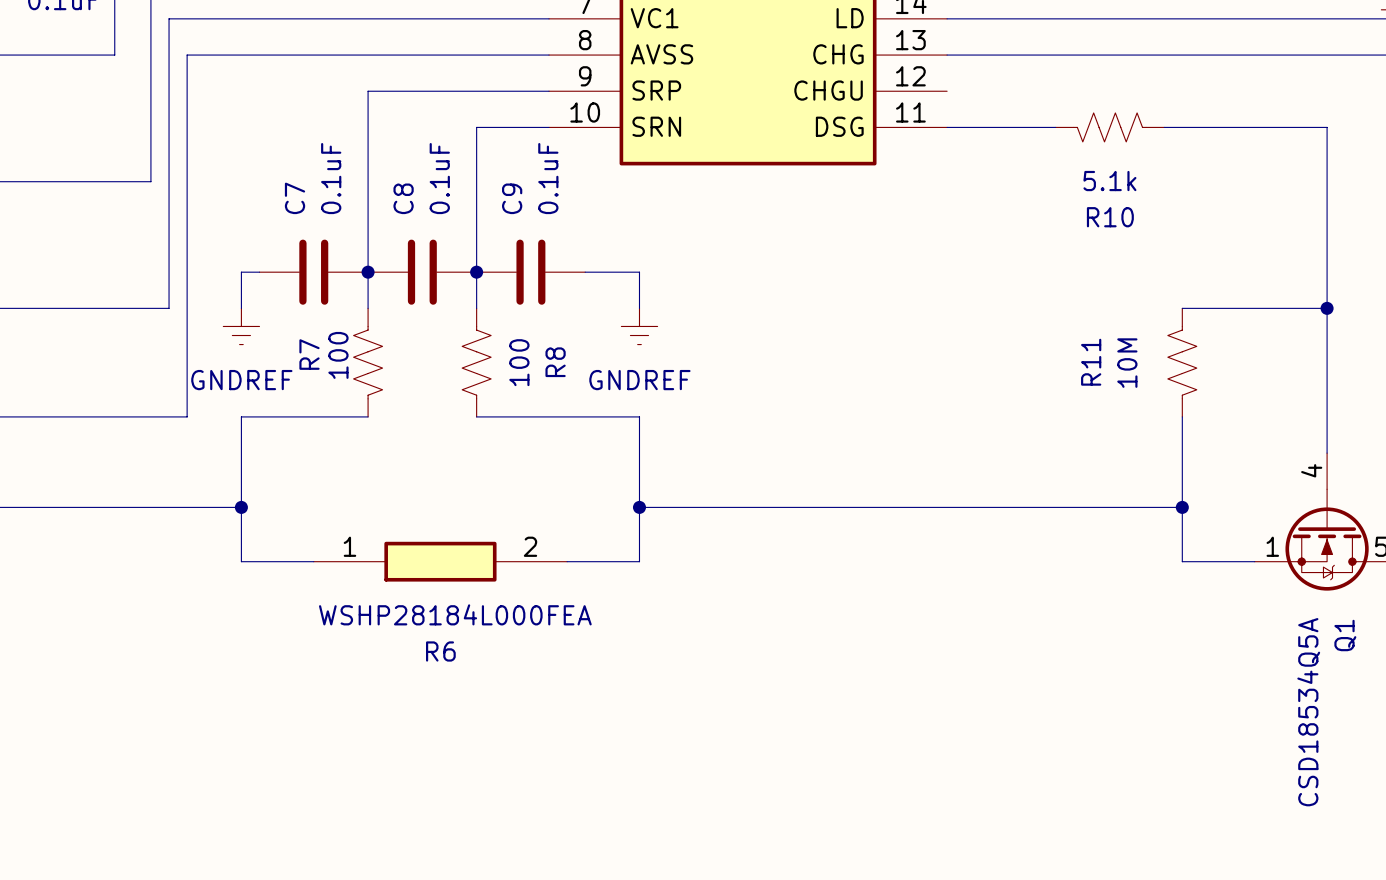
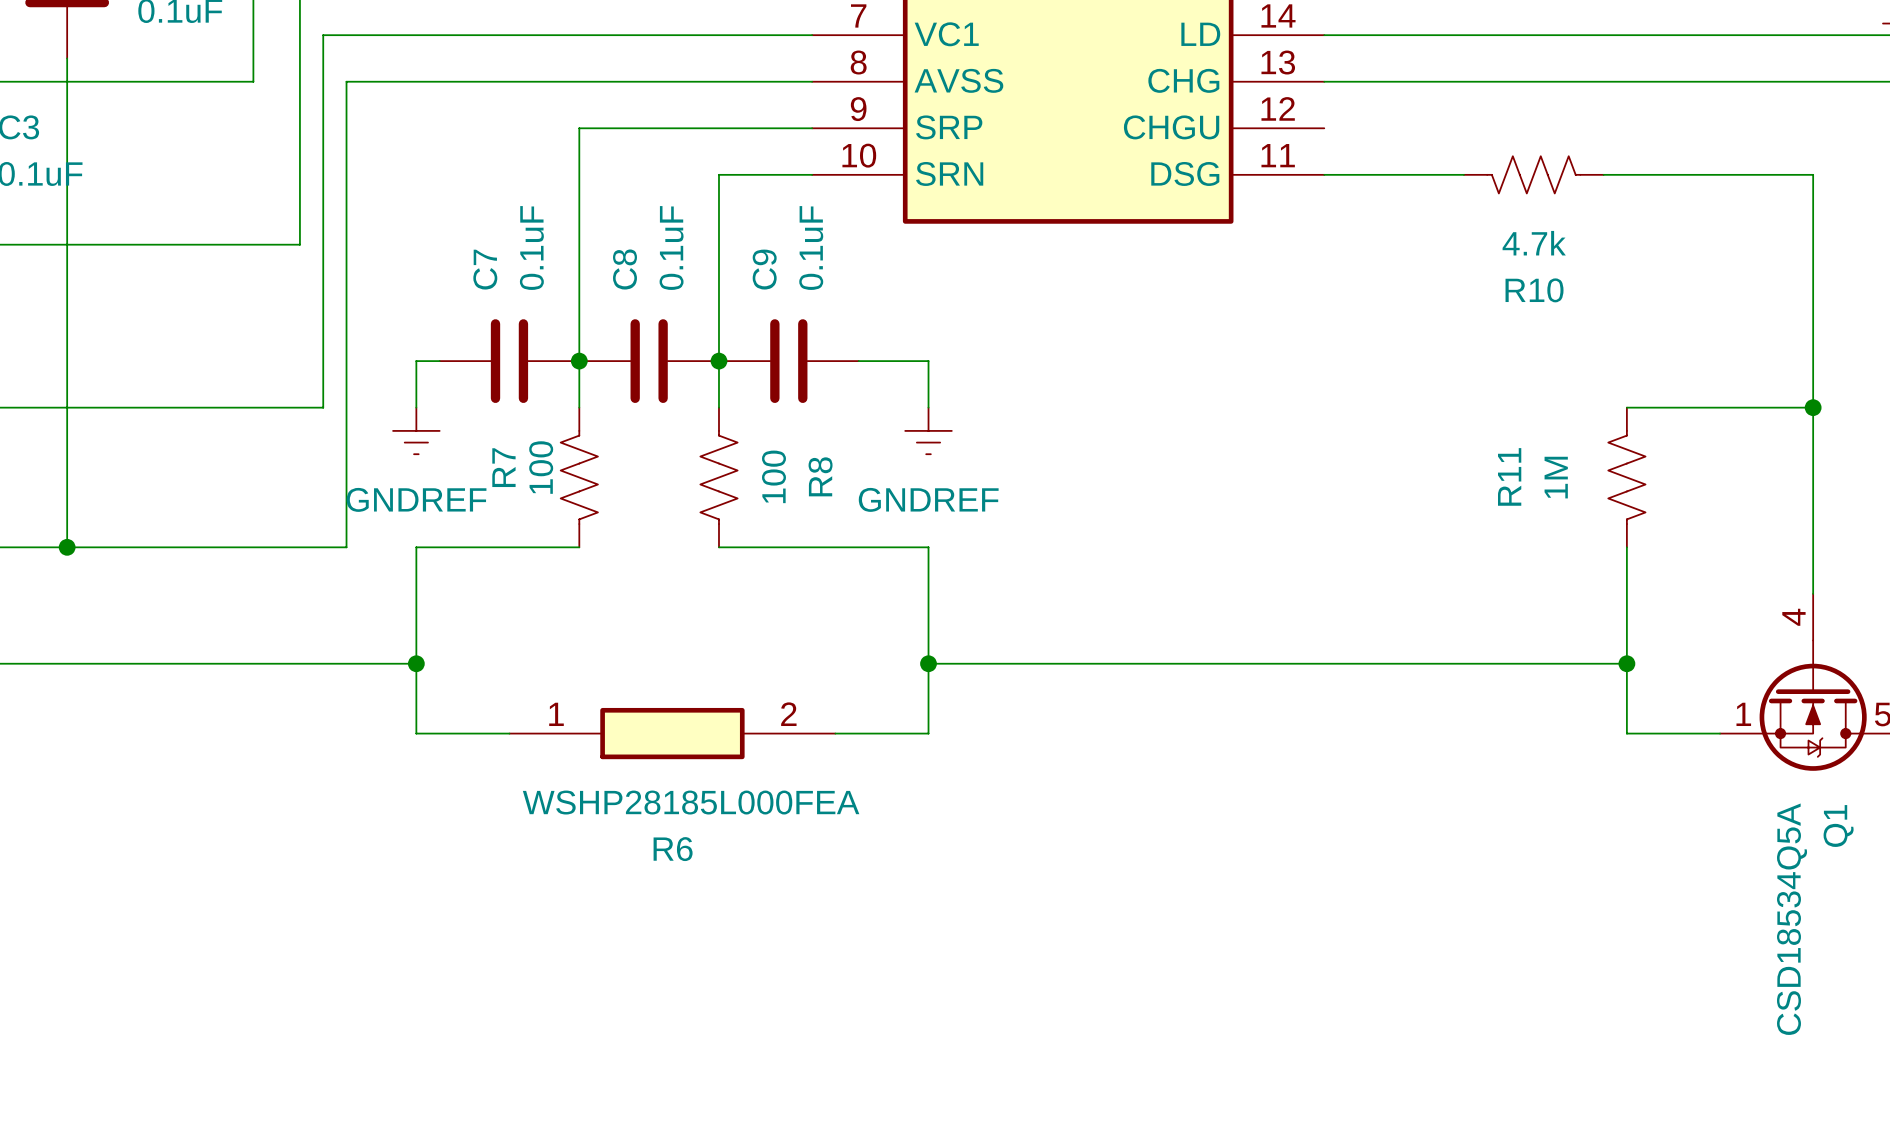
R10 value: 5.1k (1109, 181) -> 4.7k (1534, 243)
R11 value: 10M (1127, 363) -> 1M (1556, 477)
R6 value: WSHP28184L000FEA (455, 614) -> WSHP28185L000FEA (691, 802)

